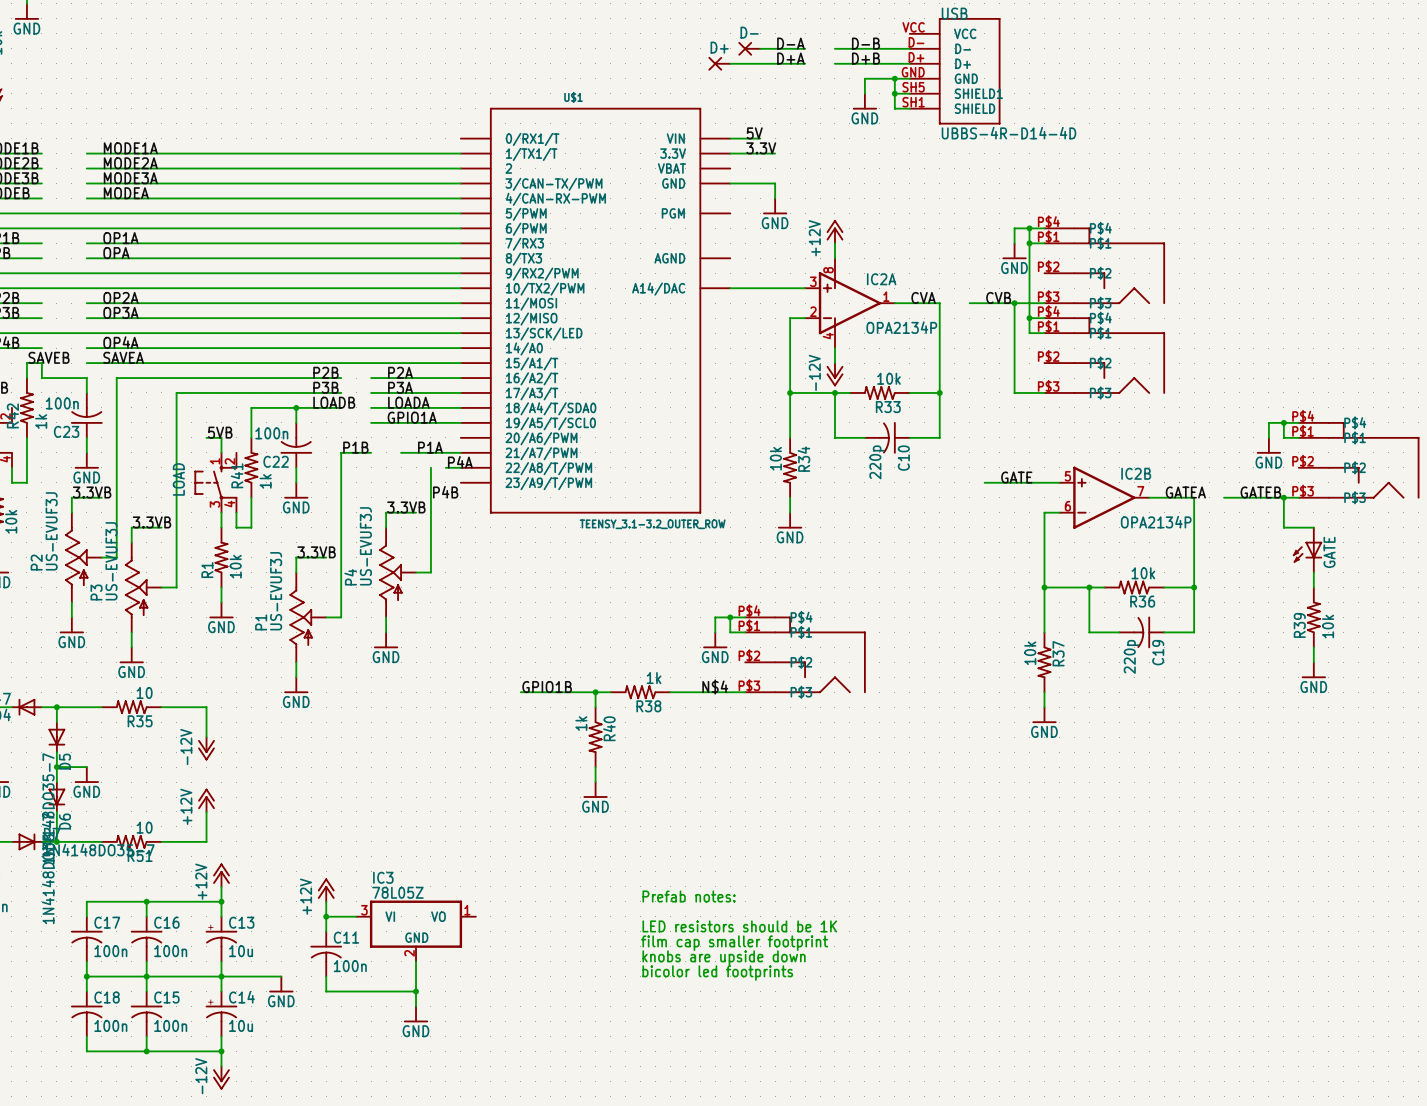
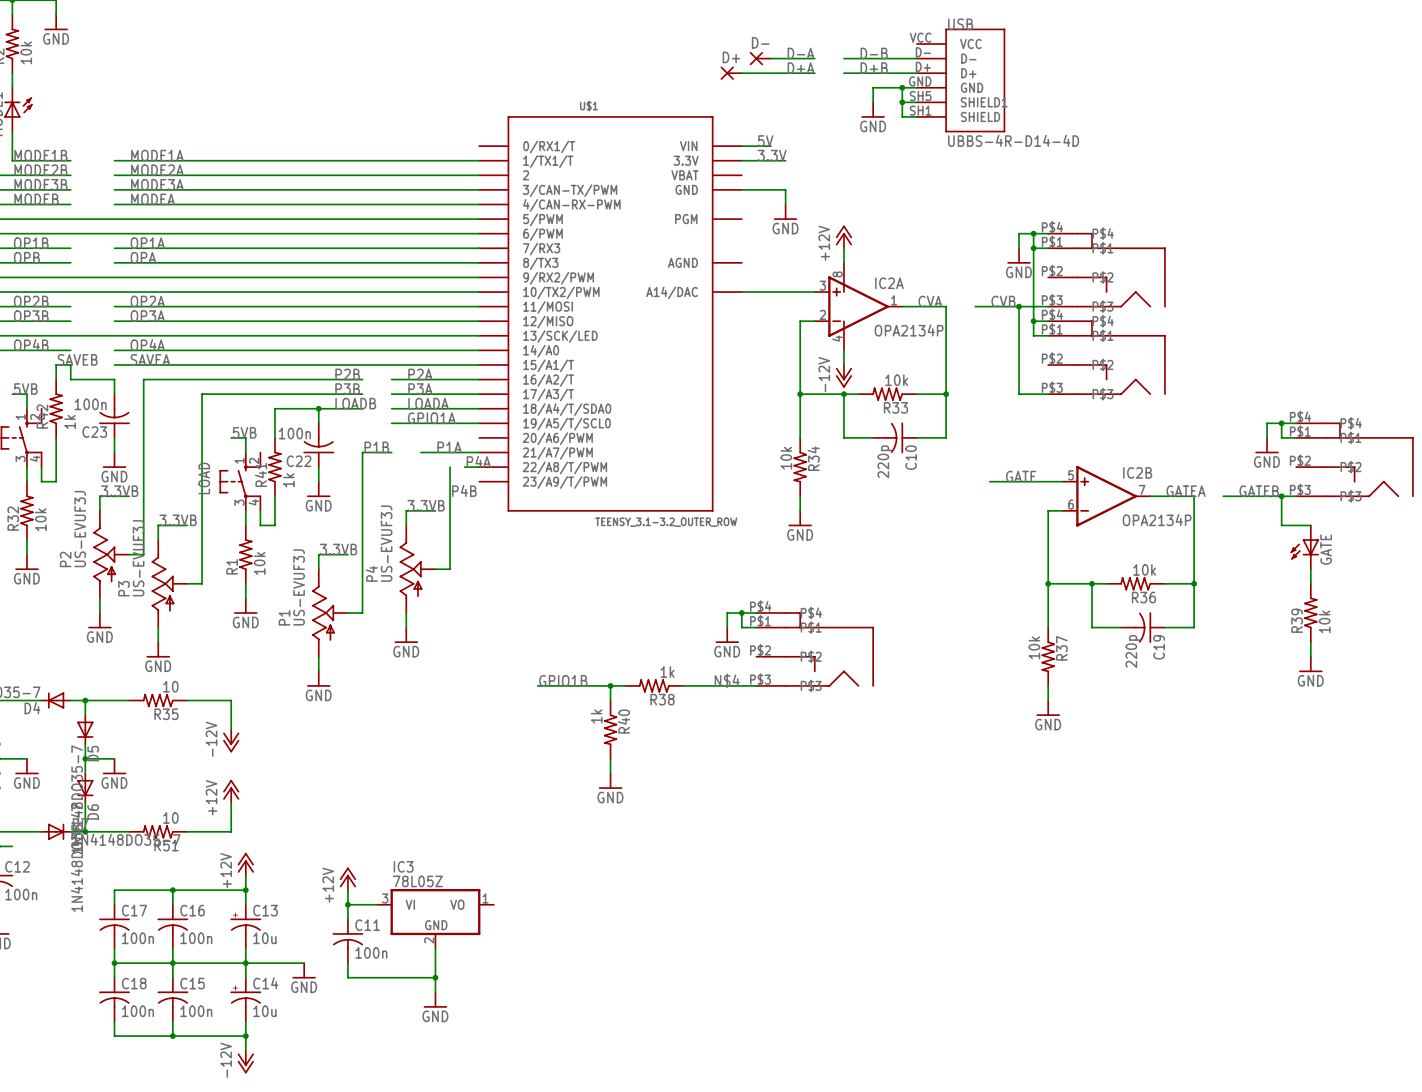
text: Prefab notes: (689, 896) -> none
text: LED resistors should be 1K (739, 926) -> none
text: film cap smaller footprint (734, 943) -> none
text: knobs are upside down (724, 958) -> none
text: bicolor led footprints (717, 973) -> none

